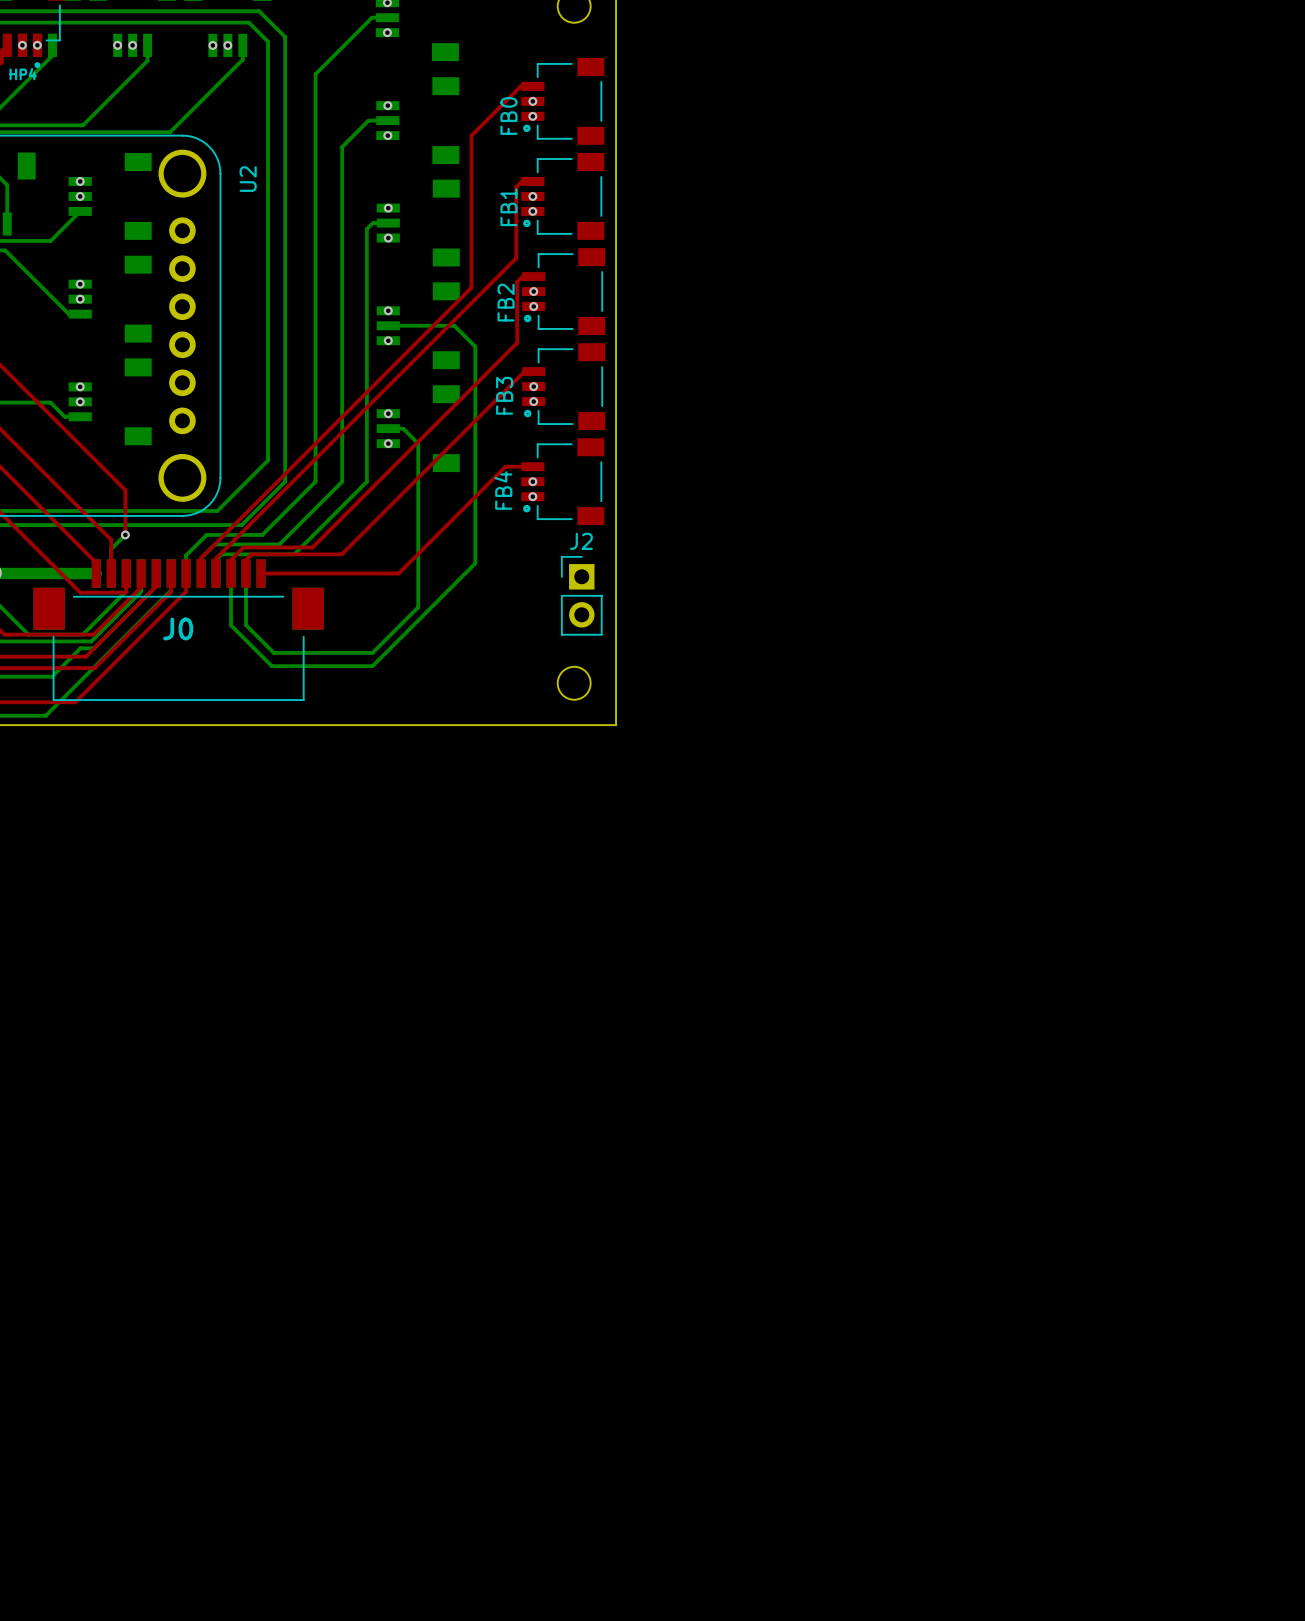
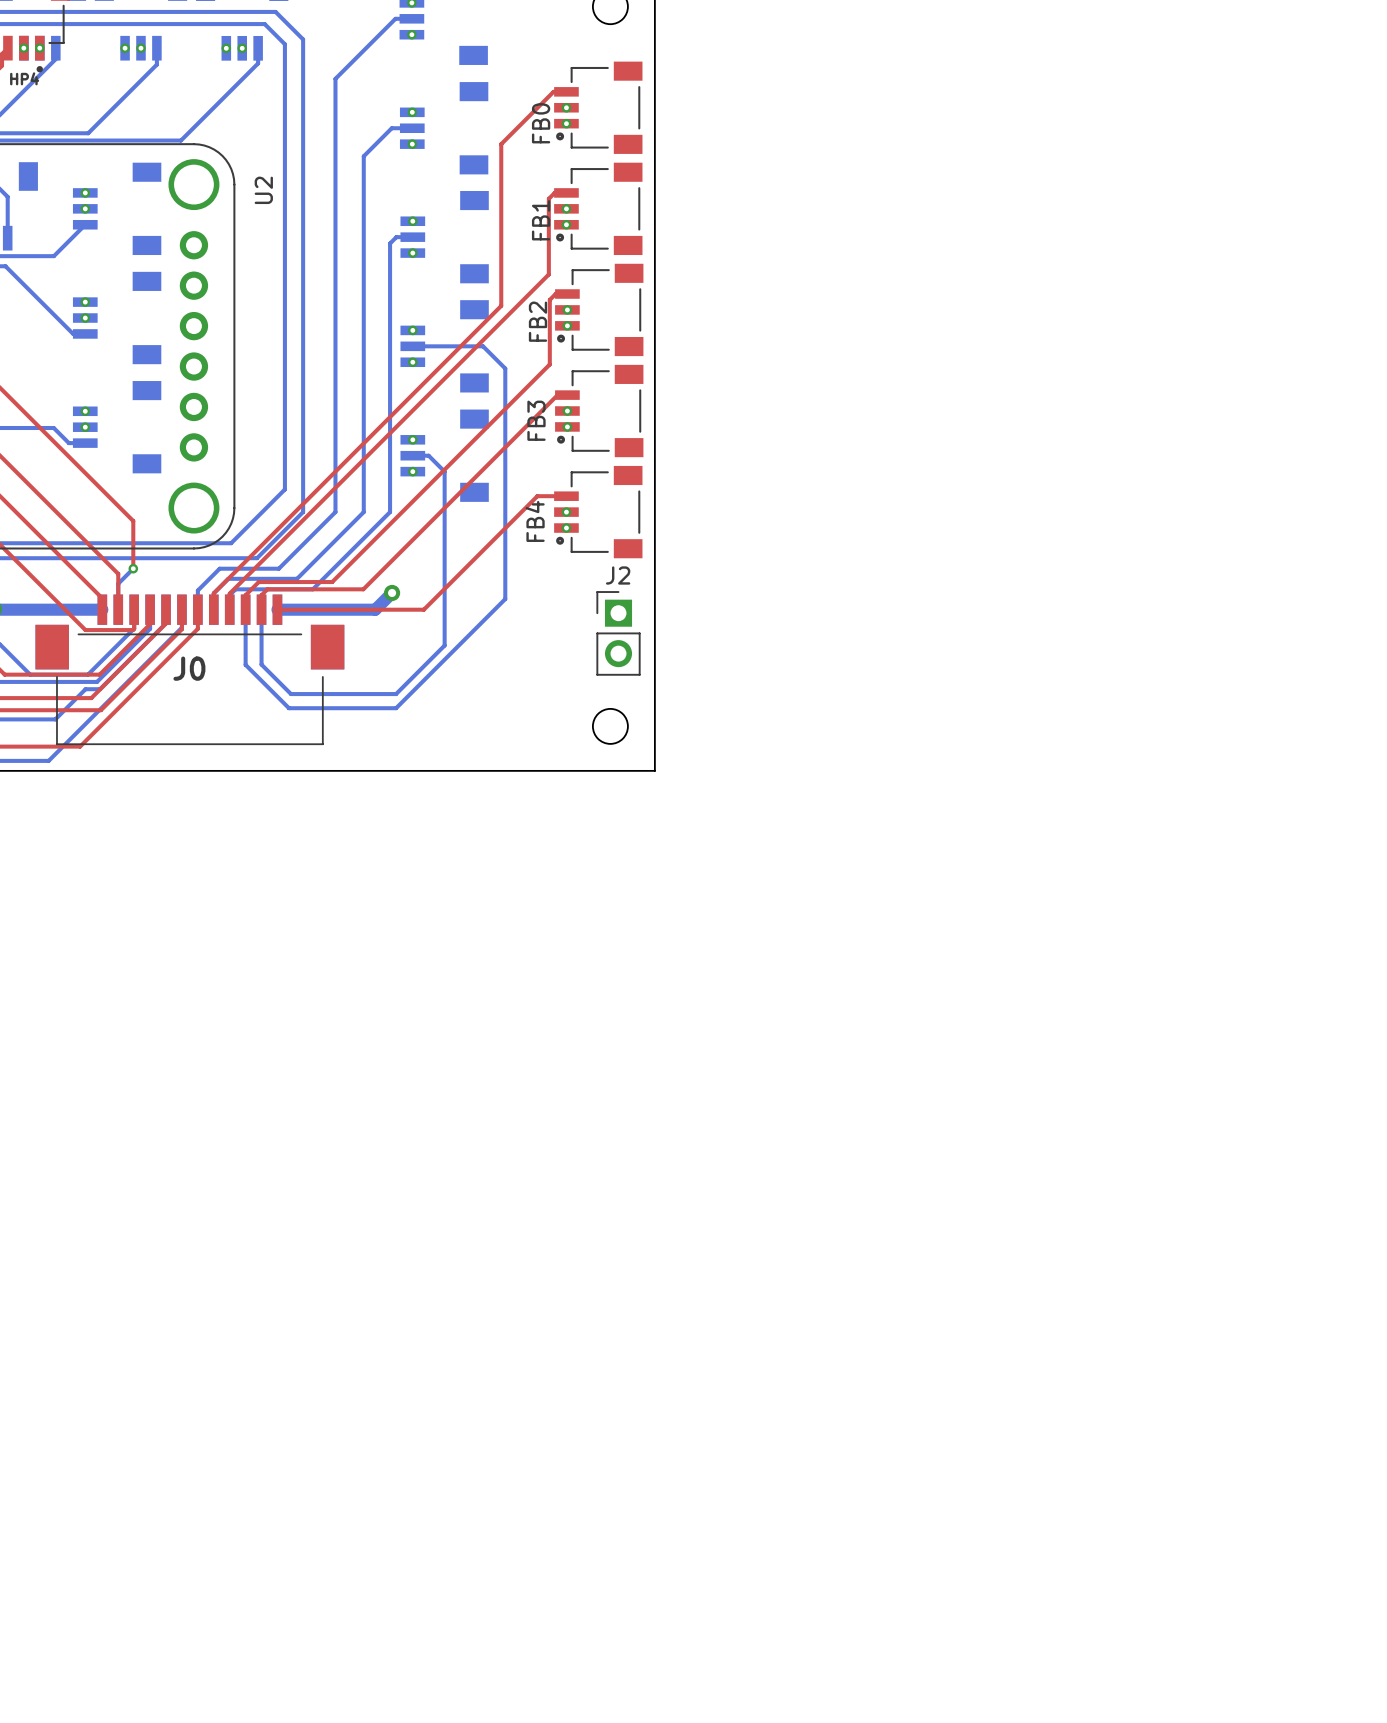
bottom track: none -> (392, 592) (375, 609) (277, 609)
via: none -> (392, 592)

